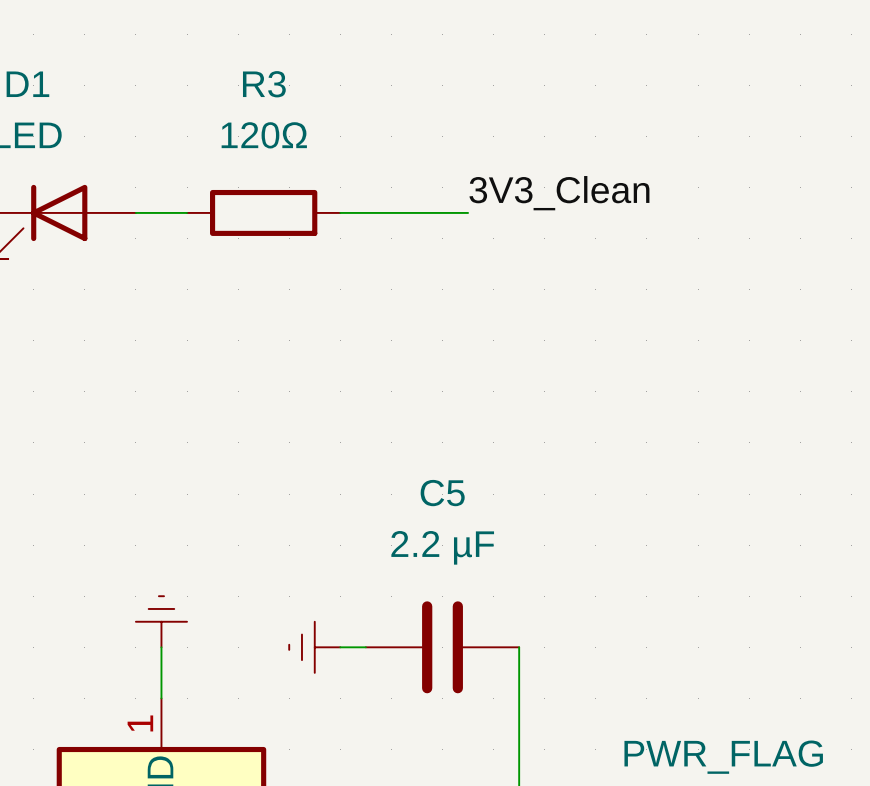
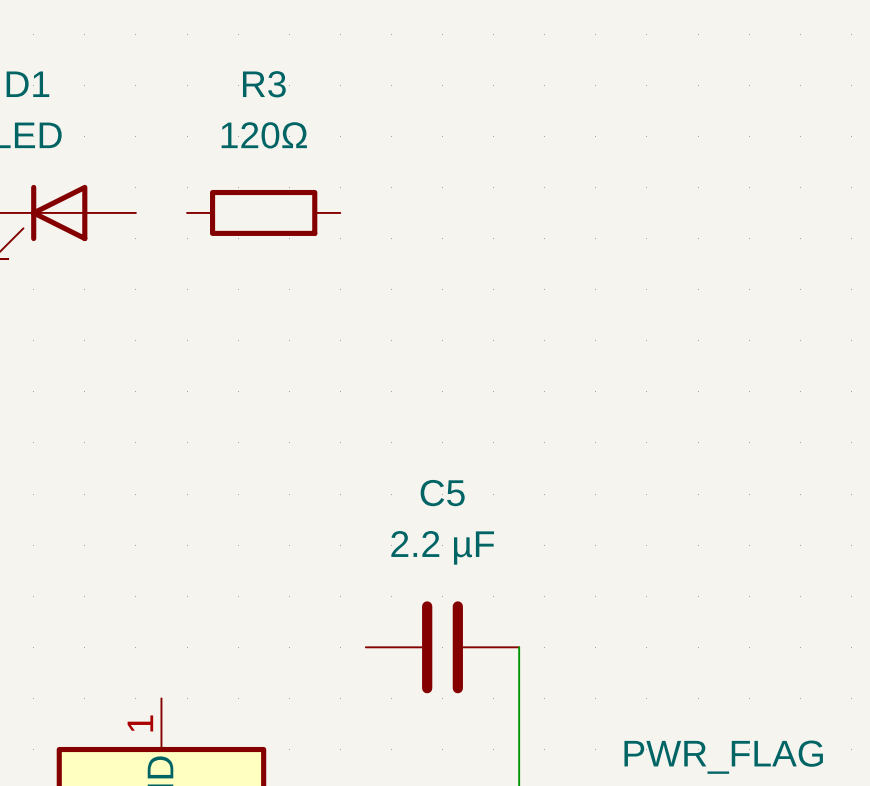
label: 3V3_Clean (559, 193) -> none
wire: (135, 212) (187, 212) -> none
wire: (340, 212) (468, 212) -> none
power symbol: (161, 621) -> none
wire: (161, 647) (161, 698) -> none
power symbol: (314, 647) -> none
wire: (340, 647) (365, 647) -> none

